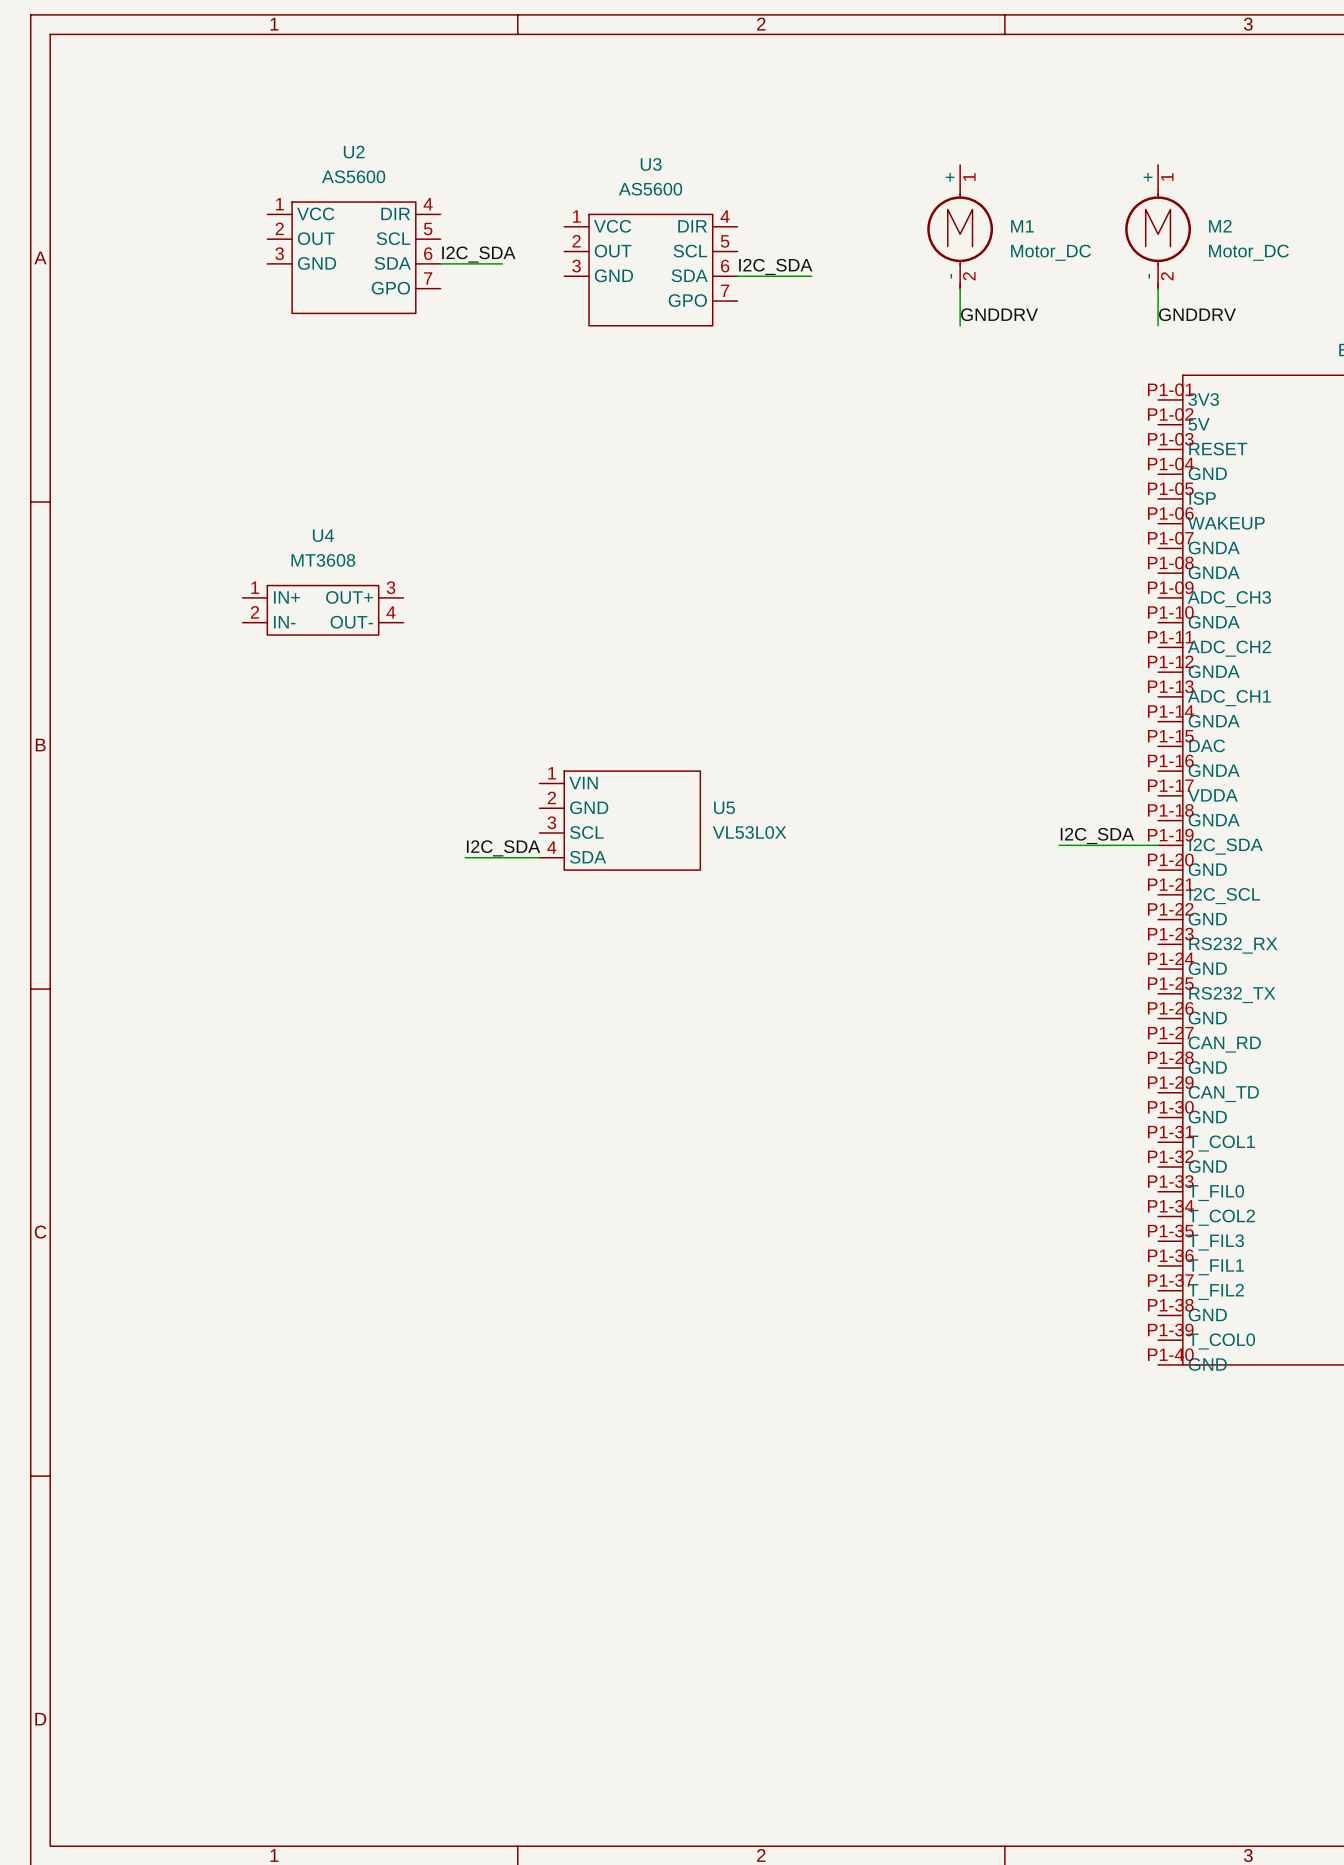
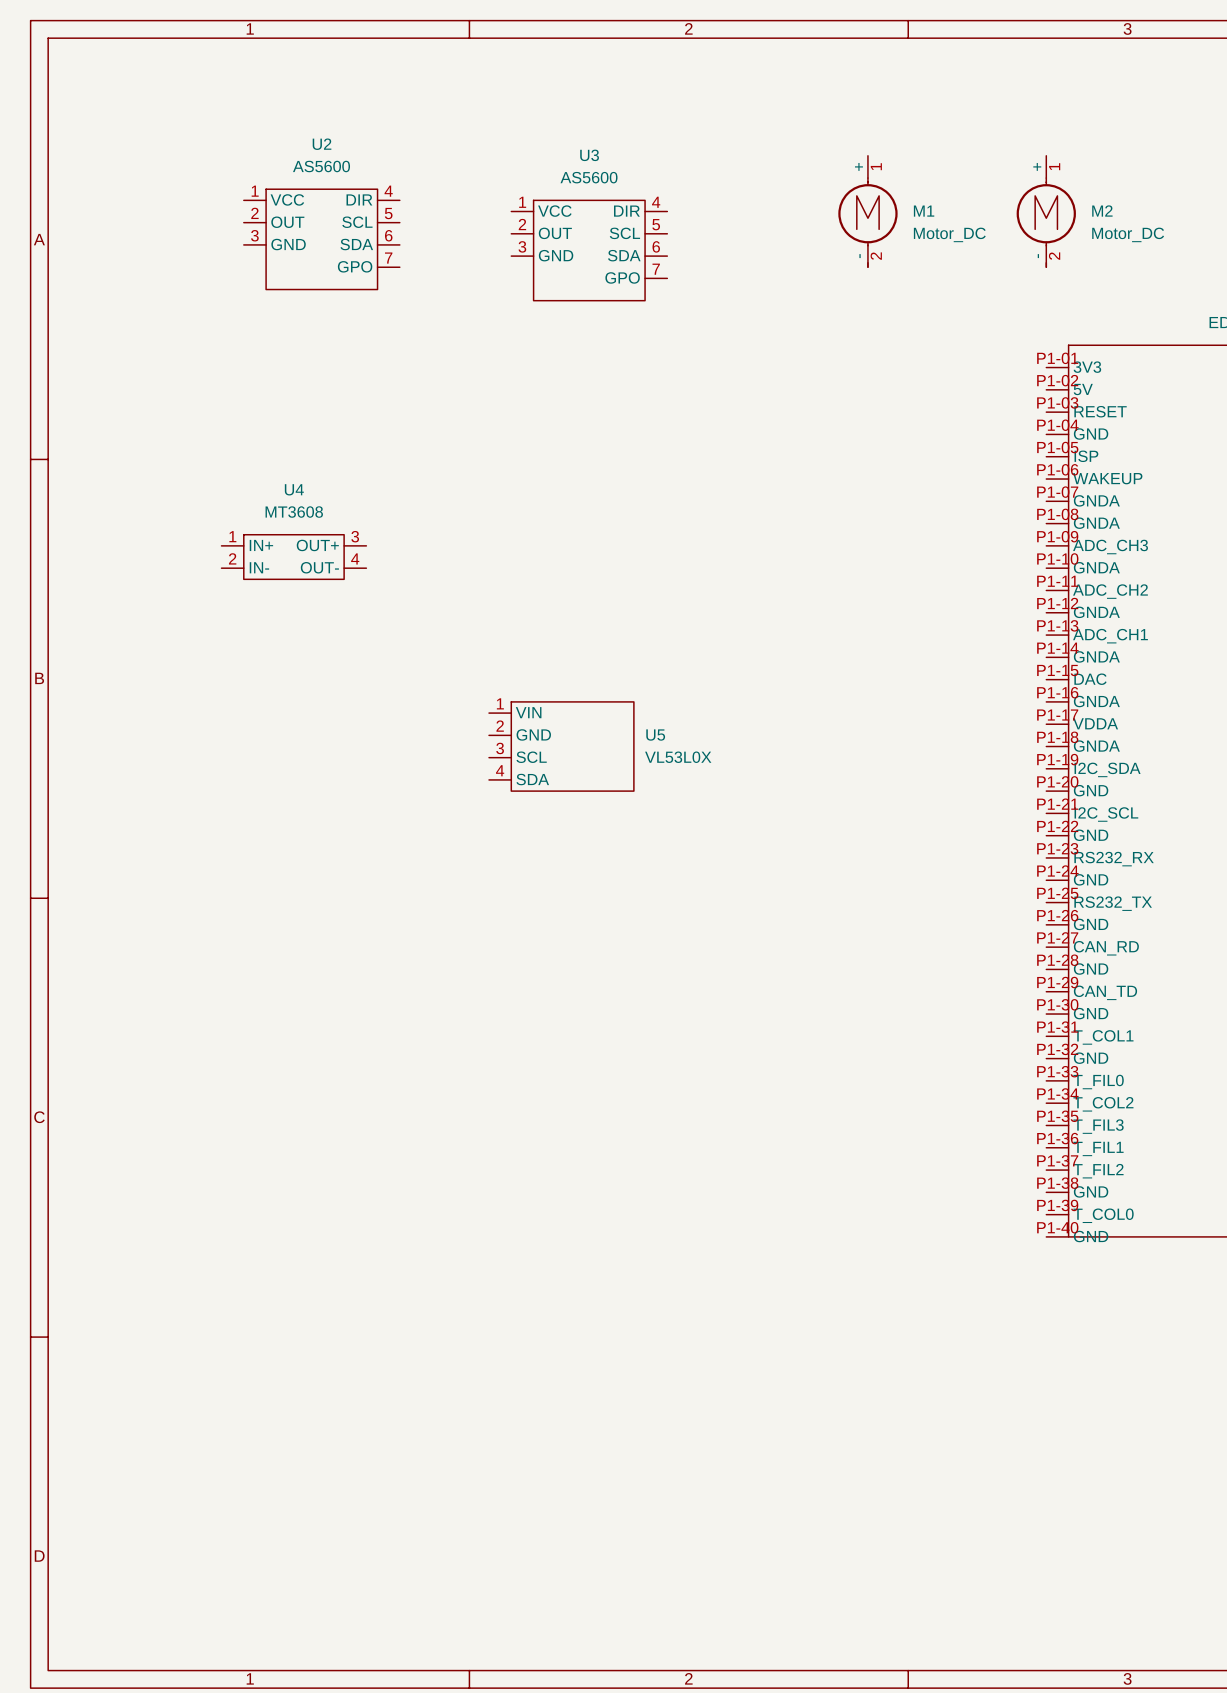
label: I2C_SDA (478, 254) -> none
wire: (440, 263) (502, 263) -> none
label: I2C_SDA (775, 266) -> none
wire: (737, 276) (811, 276) -> none
wire: (960, 288) (960, 325) -> none
wire: (1158, 288) (1158, 325) -> none
label: GNDDRV (999, 314) -> none
label: GNDDRV (1197, 314) -> none
label: I2C_SDA (1097, 836) -> none
wire: (1059, 845) (1158, 845) -> none
label: I2C_SDA (503, 848) -> none
wire: (465, 857) (539, 857) -> none

